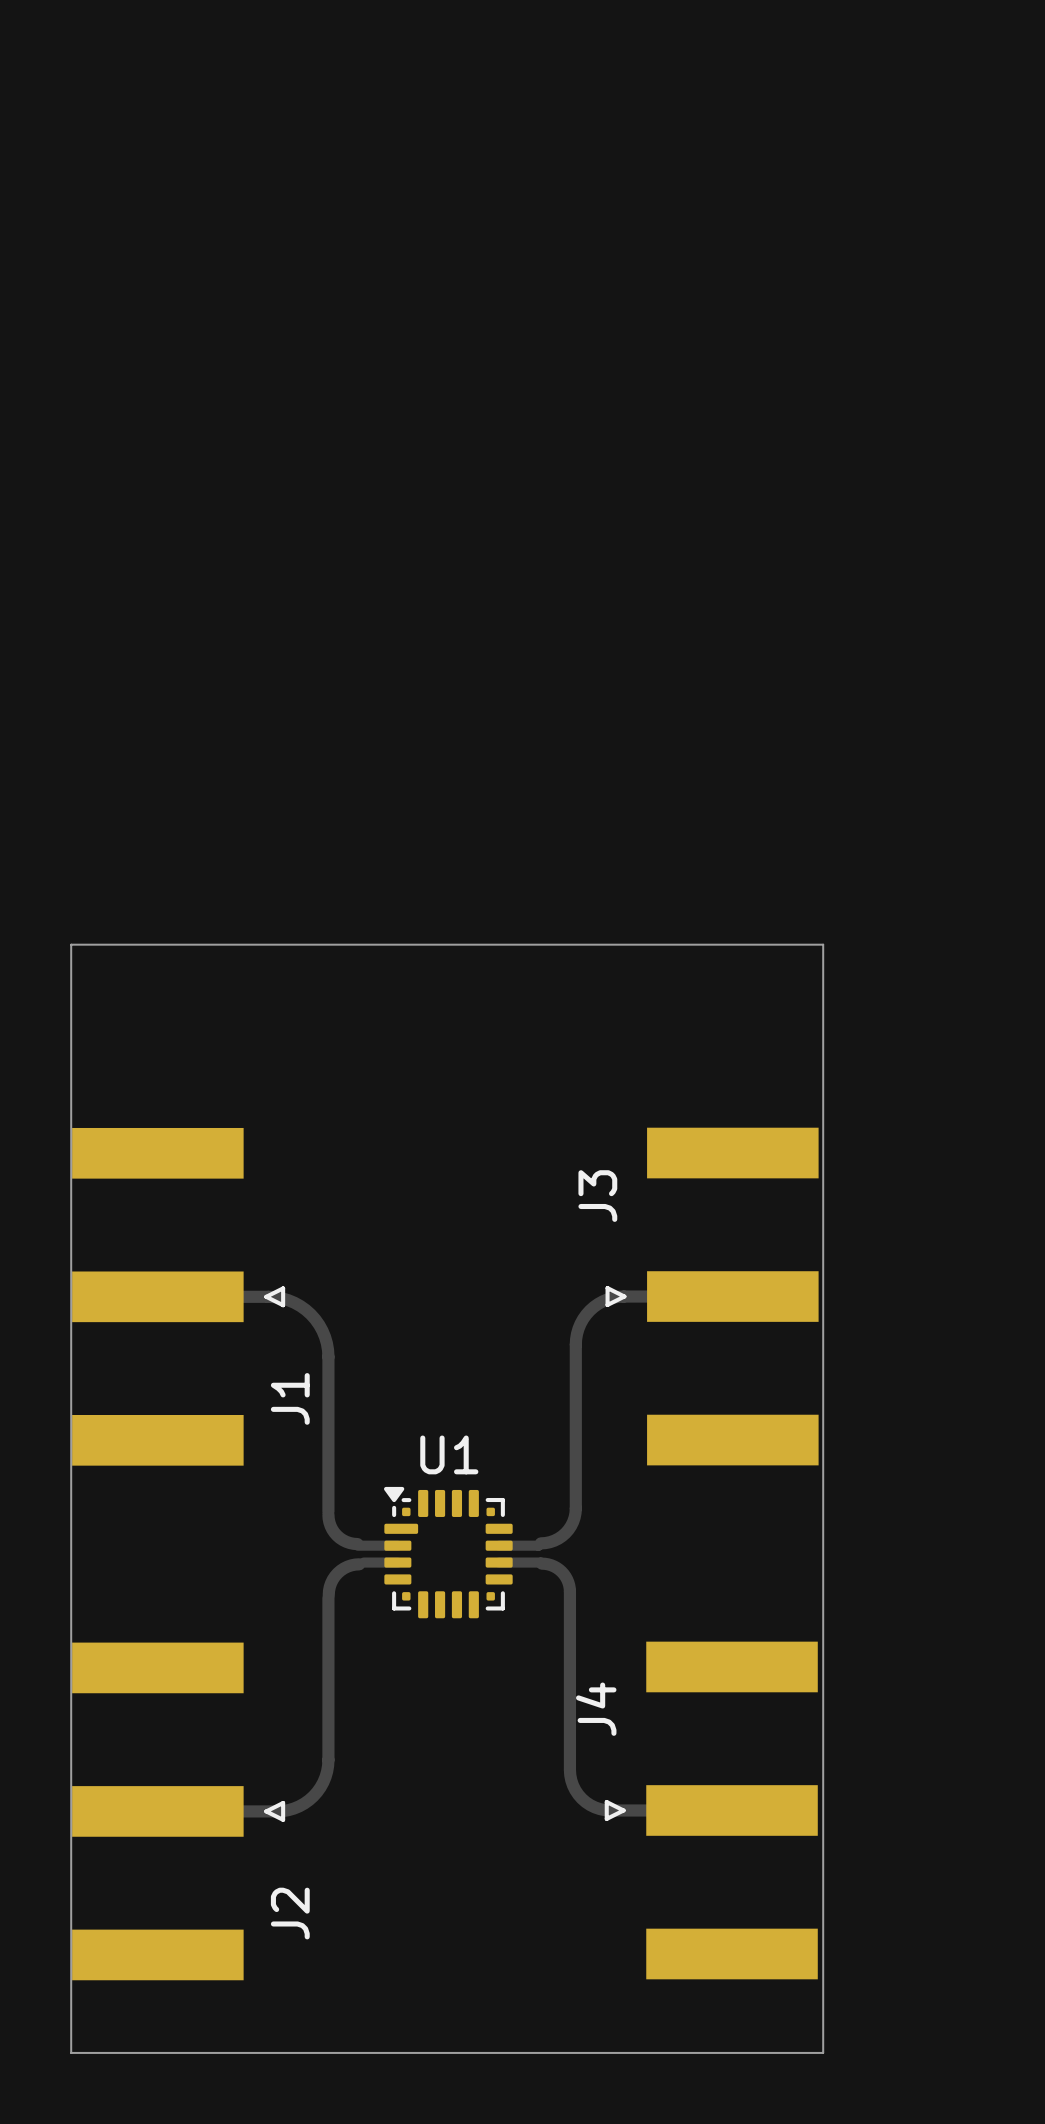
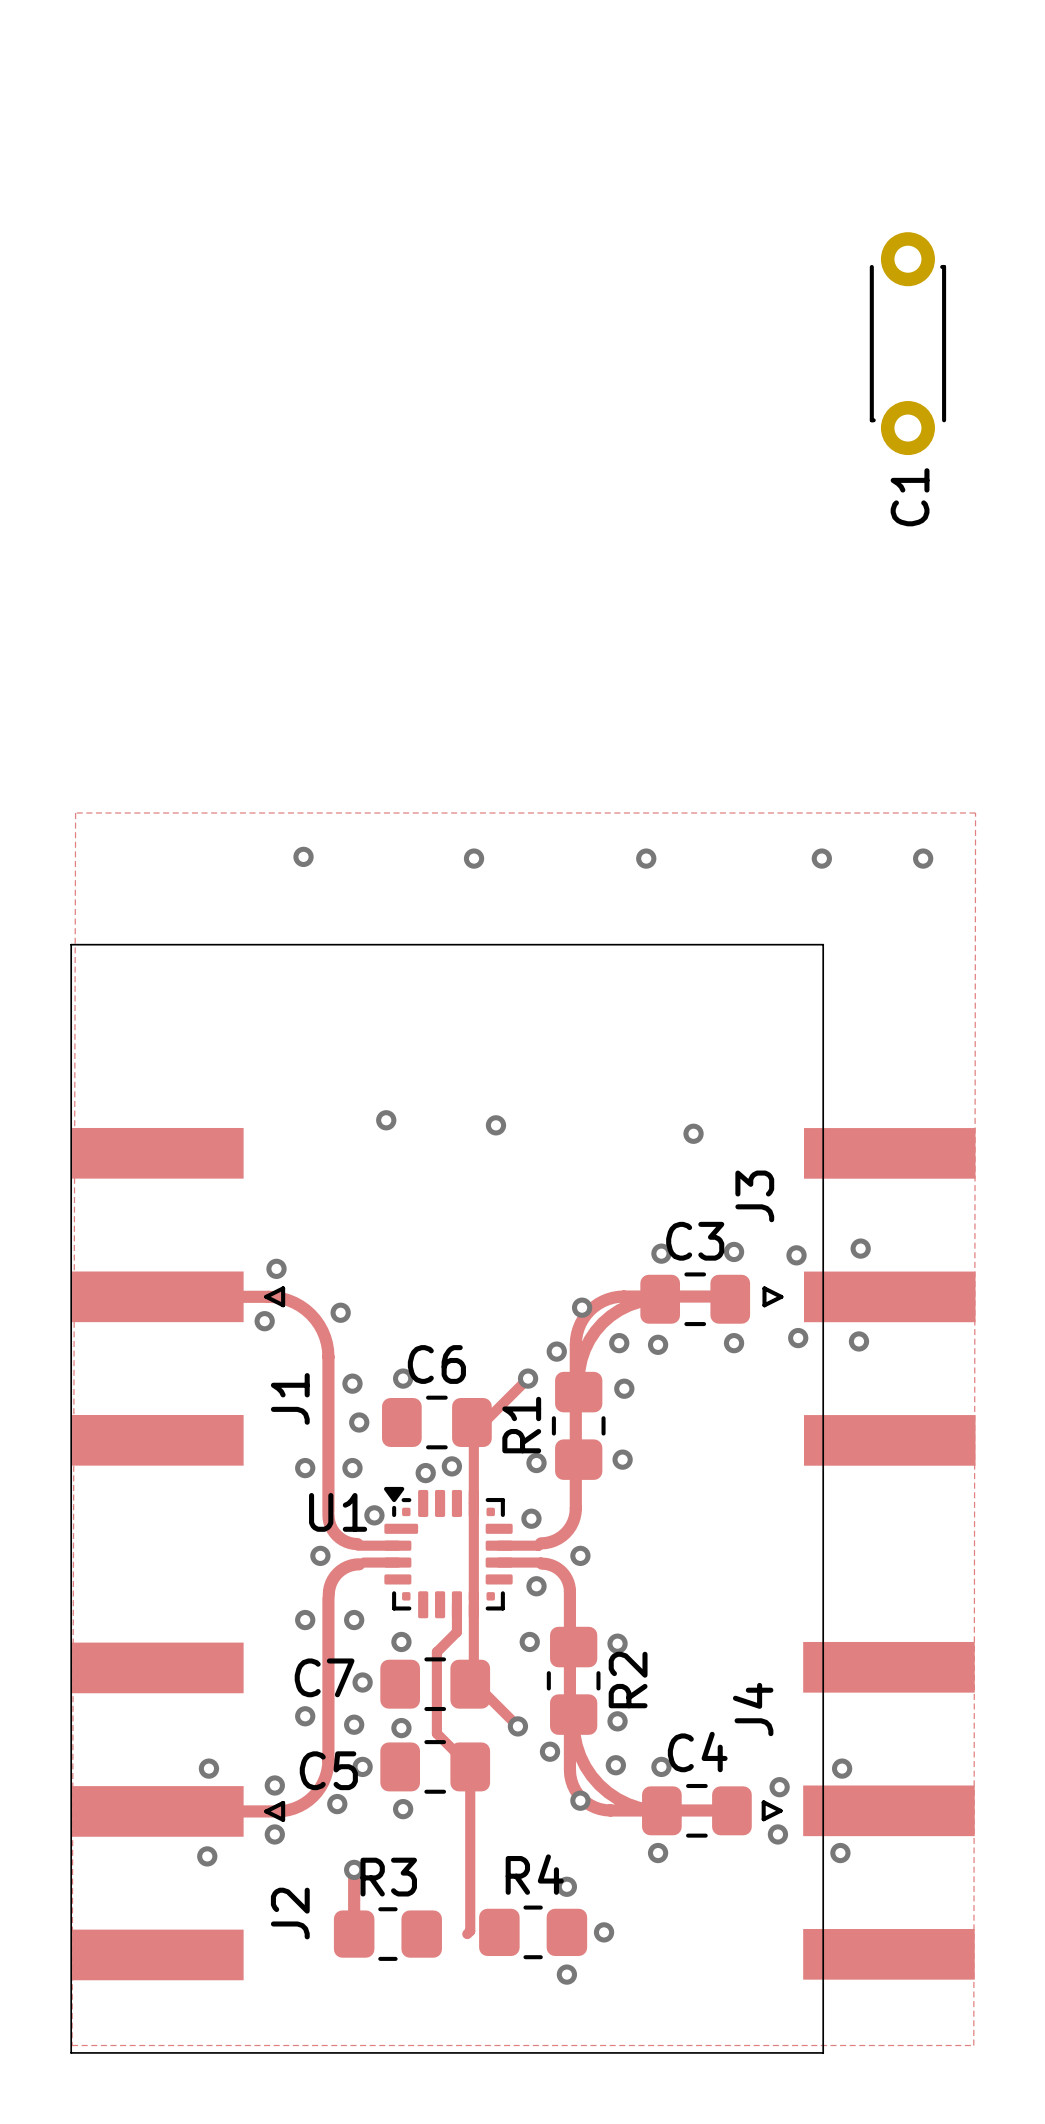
C1: none -> (907, 343)
zone outline: none -> (75, 812) (975, 812) (973, 2045) (72, 2045) (75, 812)
via: none -> (303, 856)
via: none -> (474, 858)
via: none -> (646, 858)
via: none -> (821, 858)
via: none -> (923, 858)
via: none -> (386, 1120)
via: none -> (495, 1125)
via: none -> (693, 1133)
via: none -> (860, 1248)
via: none -> (734, 1251)
via: none -> (661, 1253)
via: none -> (796, 1255)
via: none -> (276, 1268)
J3 position: (712, 1296) -> (869, 1296)
track: none -> (660, 1299) (629, 1305) (602, 1323) (584, 1349) (579, 1370) (578, 1392)
C3: none -> (695, 1299)
via: none -> (582, 1307)
via: none -> (340, 1312)
via: none -> (264, 1321)
via: none -> (798, 1338)
via: none -> (858, 1341)
via: none -> (619, 1343)
via: none -> (734, 1343)
via: none -> (658, 1344)
via: none -> (556, 1351)
via: none -> (403, 1378)
track: none -> (528, 1378) (484, 1422) (471, 1422) (473, 1424) (473, 1599)
via: none -> (528, 1378)
via: none -> (352, 1383)
via: none -> (624, 1388)
via: none -> (359, 1422)
C6: none -> (436, 1422)
R1: none -> (578, 1425)
U1 name position: U1 (449, 1454) -> U1 (338, 1512)
via: none -> (622, 1459)
via: none -> (536, 1463)
via: none -> (451, 1466)
via: none -> (305, 1468)
via: none -> (352, 1468)
via: none -> (425, 1473)
via: none -> (374, 1515)
via: none -> (531, 1518)
via: none -> (320, 1555)
via: none -> (580, 1555)
via: none -> (536, 1586)
track: none -> (456, 1604) (456, 1632) (436, 1652) (436, 1733) (470, 1766) (470, 1931) (467, 1934)
track: none -> (473, 1604) (473, 1680) (470, 1684) (475, 1684) (517, 1726)
via: none -> (305, 1620)
via: none -> (354, 1620)
via: none -> (401, 1641)
via: none -> (529, 1641)
via: none -> (617, 1643)
R2: none -> (573, 1680)
via: none -> (362, 1682)
C7: none -> (435, 1684)
track: none -> (573, 1714) (574, 1734) (580, 1756) (585, 1766) (599, 1784) (608, 1792) (628, 1804) (650, 1810) (661, 1810)
via: none -> (305, 1716)
via: none -> (617, 1721)
via: none -> (354, 1724)
via: none -> (517, 1726)
via: none -> (401, 1728)
via: none -> (550, 1751)
via: none -> (615, 1765)
via: none -> (362, 1766)
C5: none -> (435, 1766)
via: none -> (661, 1766)
via: none -> (208, 1768)
via: none -> (842, 1768)
via: none -> (274, 1785)
via: none -> (779, 1787)
via: none -> (580, 1800)
via: none -> (337, 1804)
via: none -> (403, 1809)
C4: none -> (696, 1810)
J4 position: (711, 1810) -> (868, 1810)
via: none -> (274, 1834)
via: none -> (777, 1834)
via: none -> (658, 1853)
via: none -> (840, 1853)
via: none -> (207, 1856)
track: none -> (354, 1869) (354, 1934)
via: none -> (354, 1869)
via: none -> (566, 1886)
R4: none -> (533, 1932)
via: none -> (604, 1932)
R3: none -> (387, 1934)
via: none -> (566, 1974)

